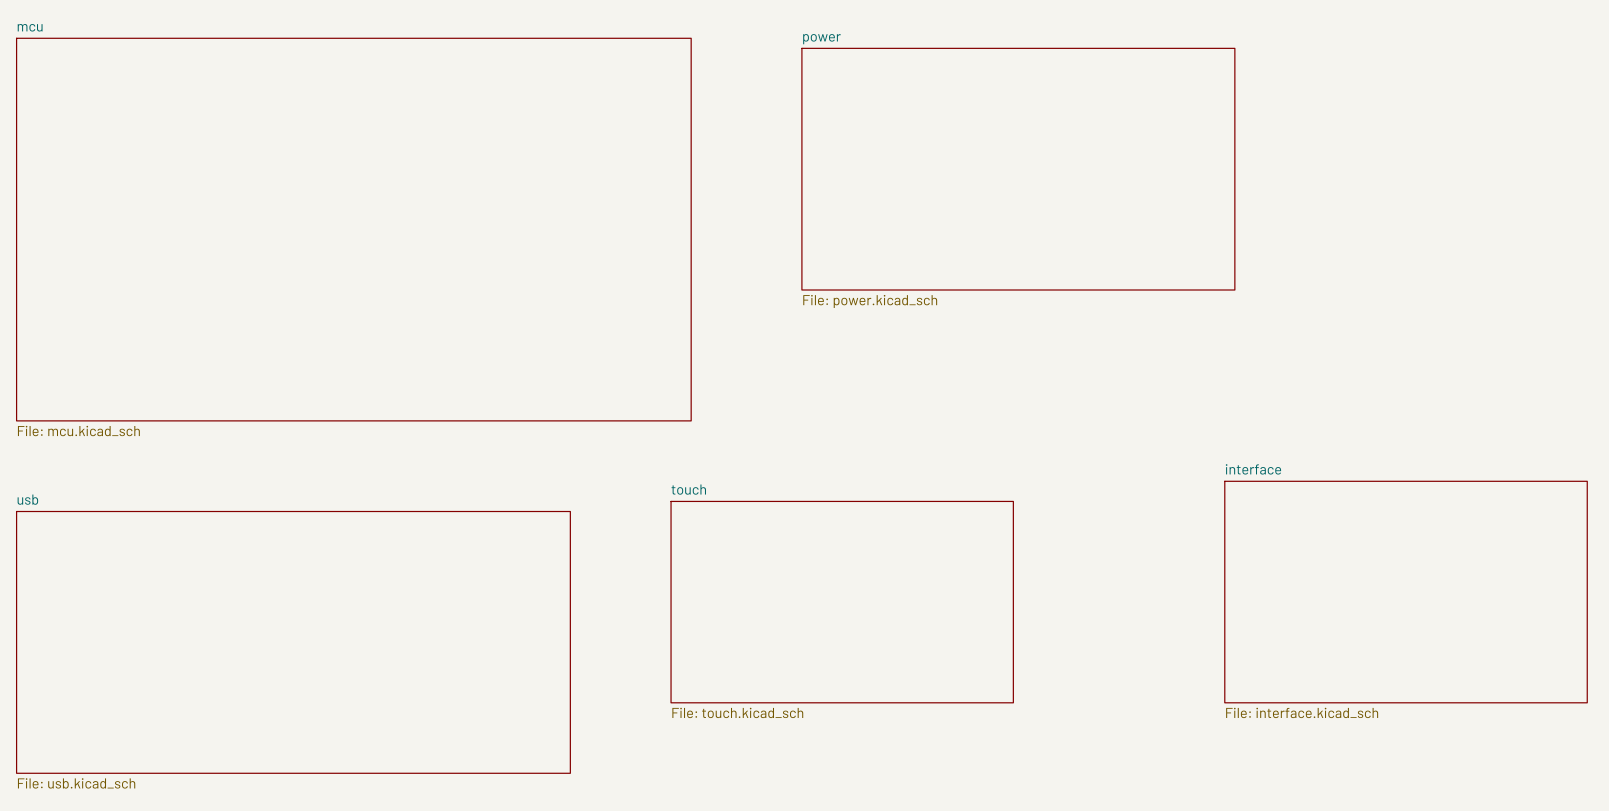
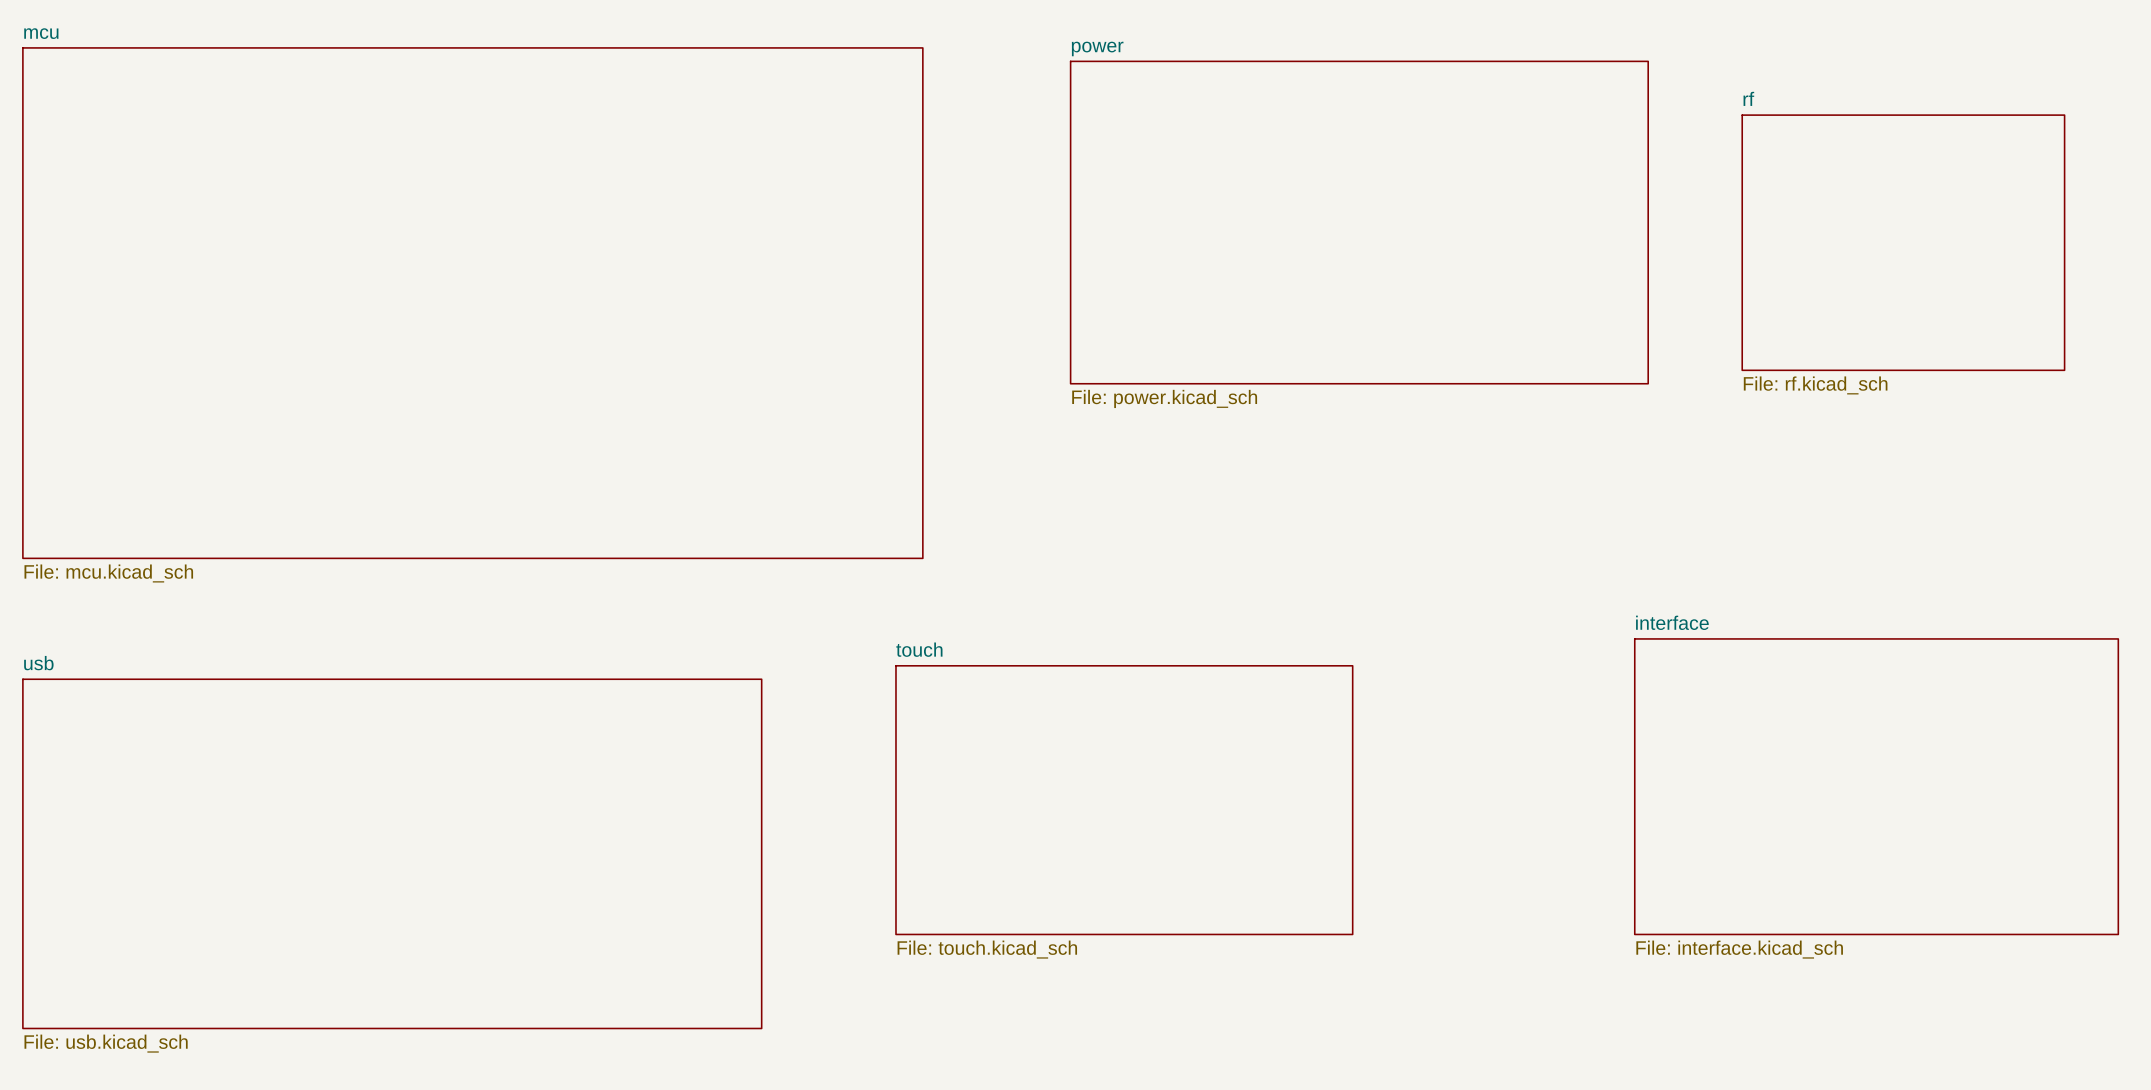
sheet rf: none -> File: rf.kicad_sch (1903, 242)

